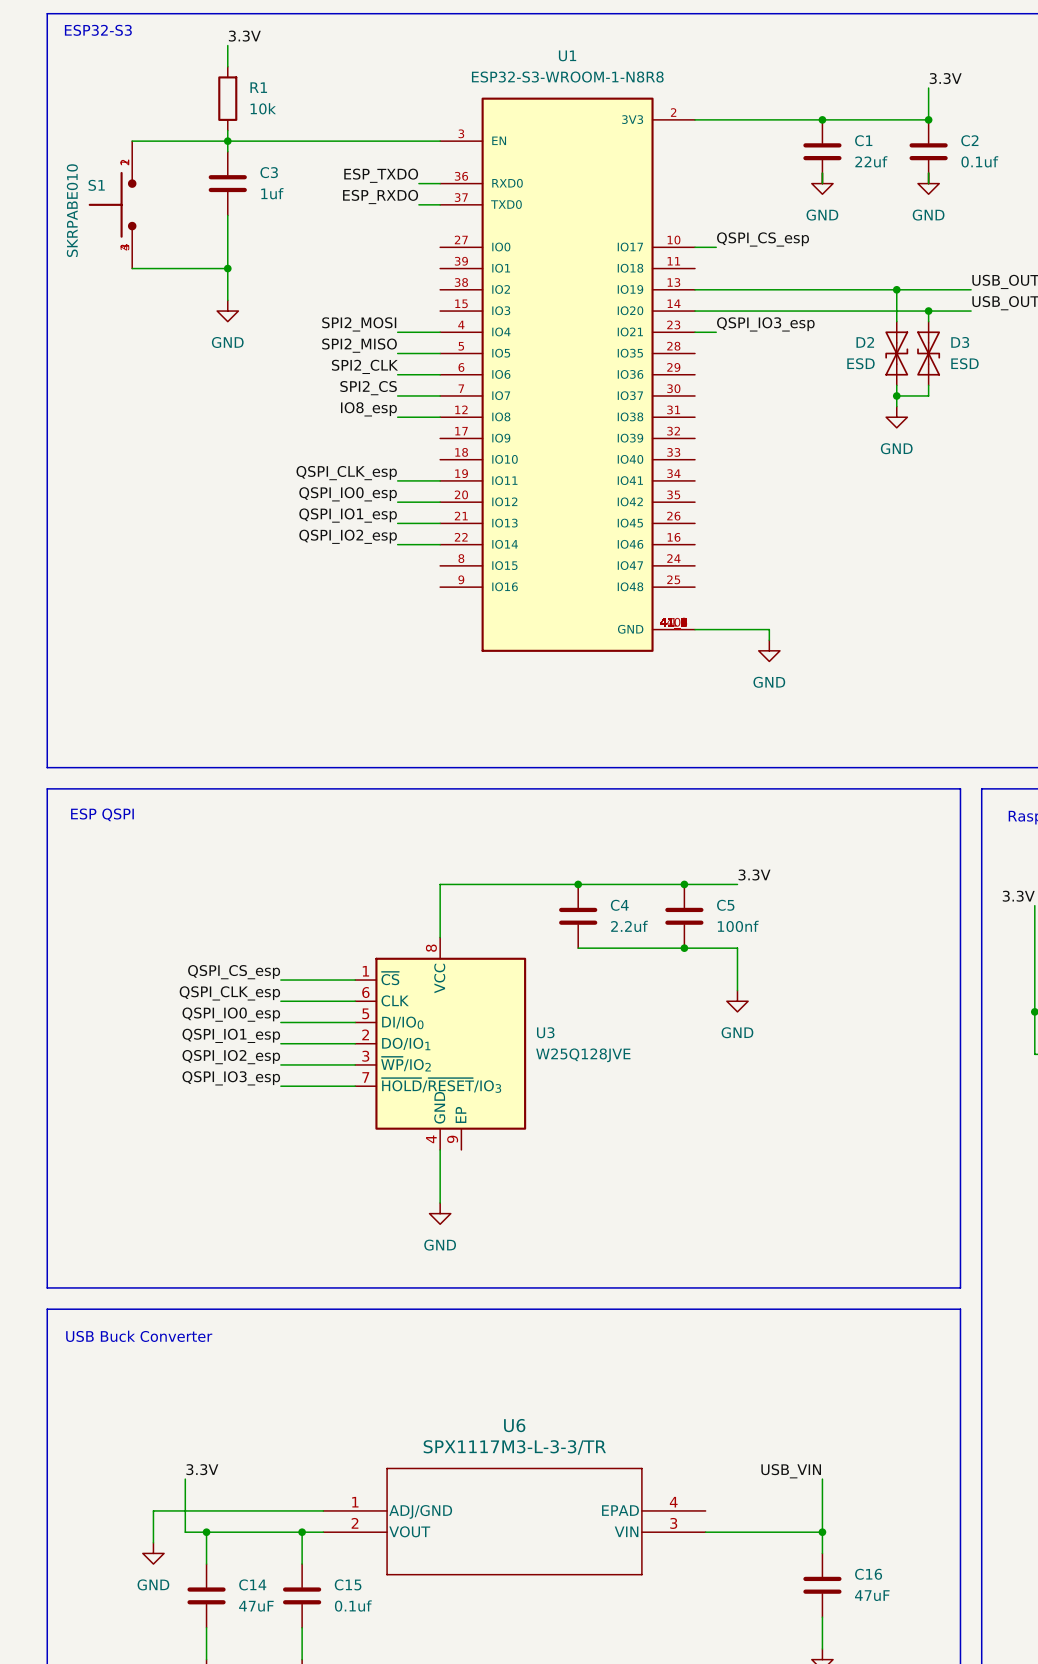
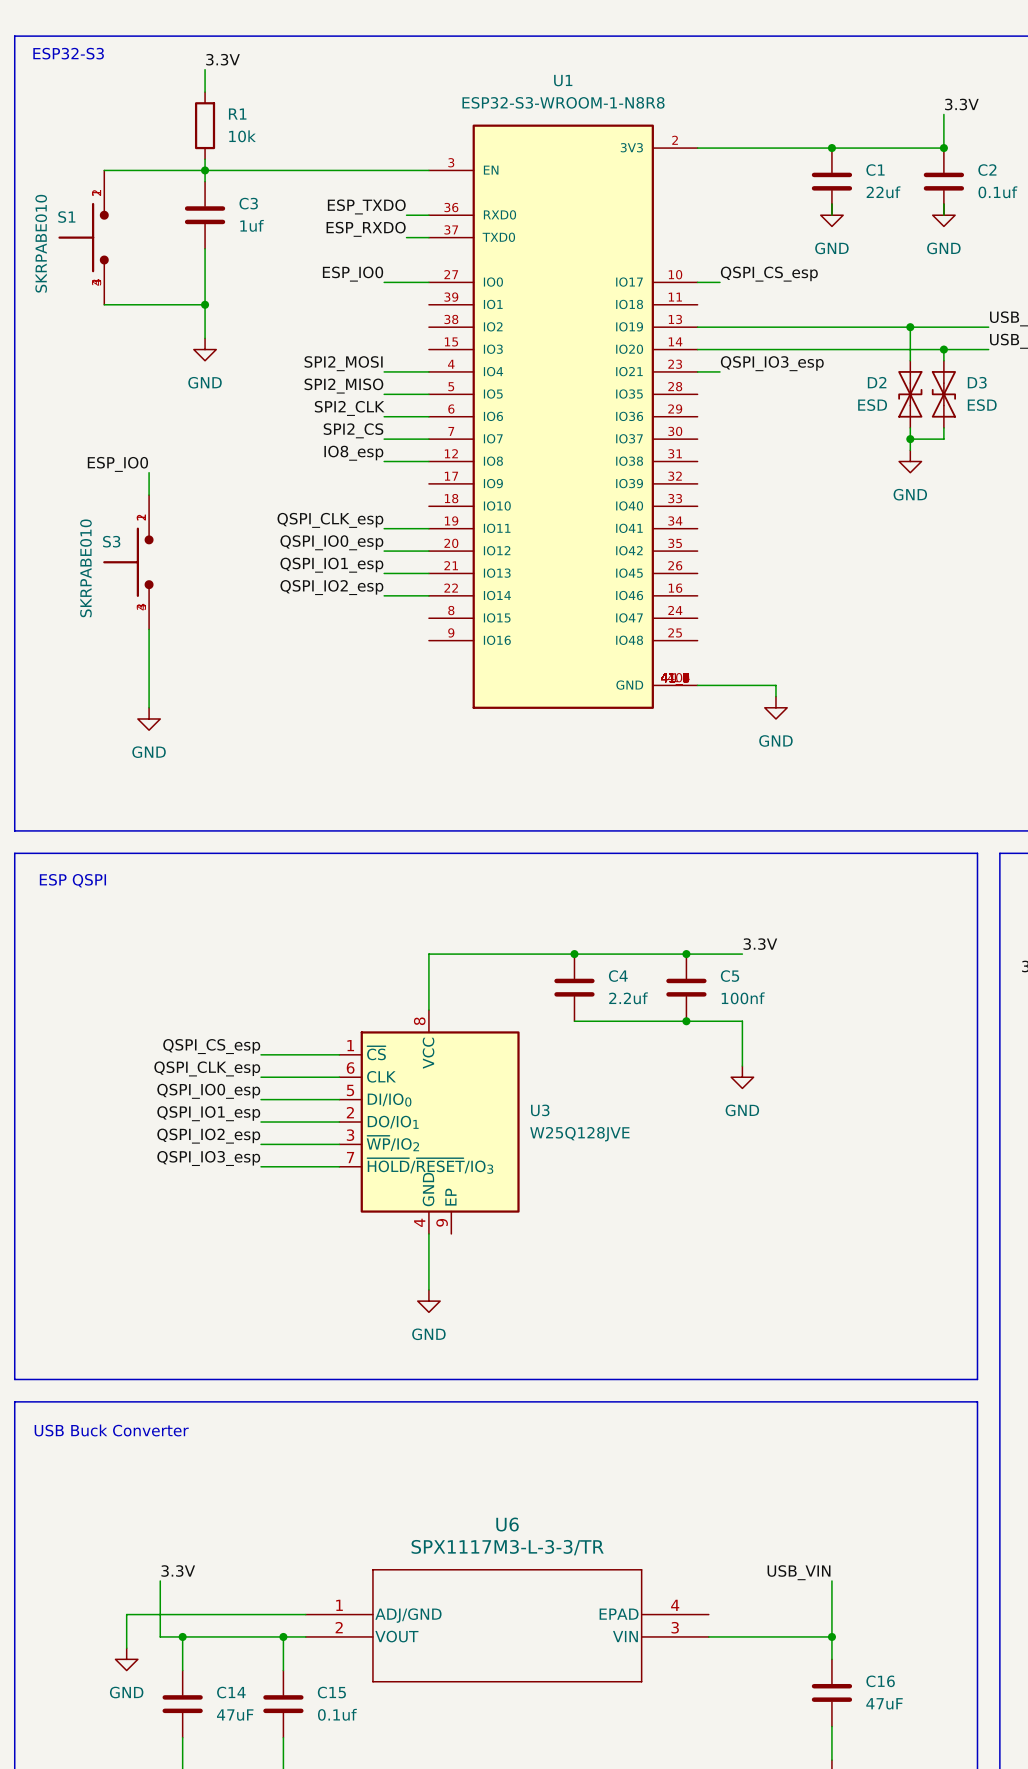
label: none -> ESP_IO0 (353, 274)
wire: none -> (384, 282) (428, 282)
label: none -> ESP_IO0 (117, 464)
wire: none -> (149, 472) (149, 495)
S3: none -> SKRPABE010 (128, 562)
wire: none -> (149, 629) (149, 707)
power symbol: none -> GND (149, 718)

